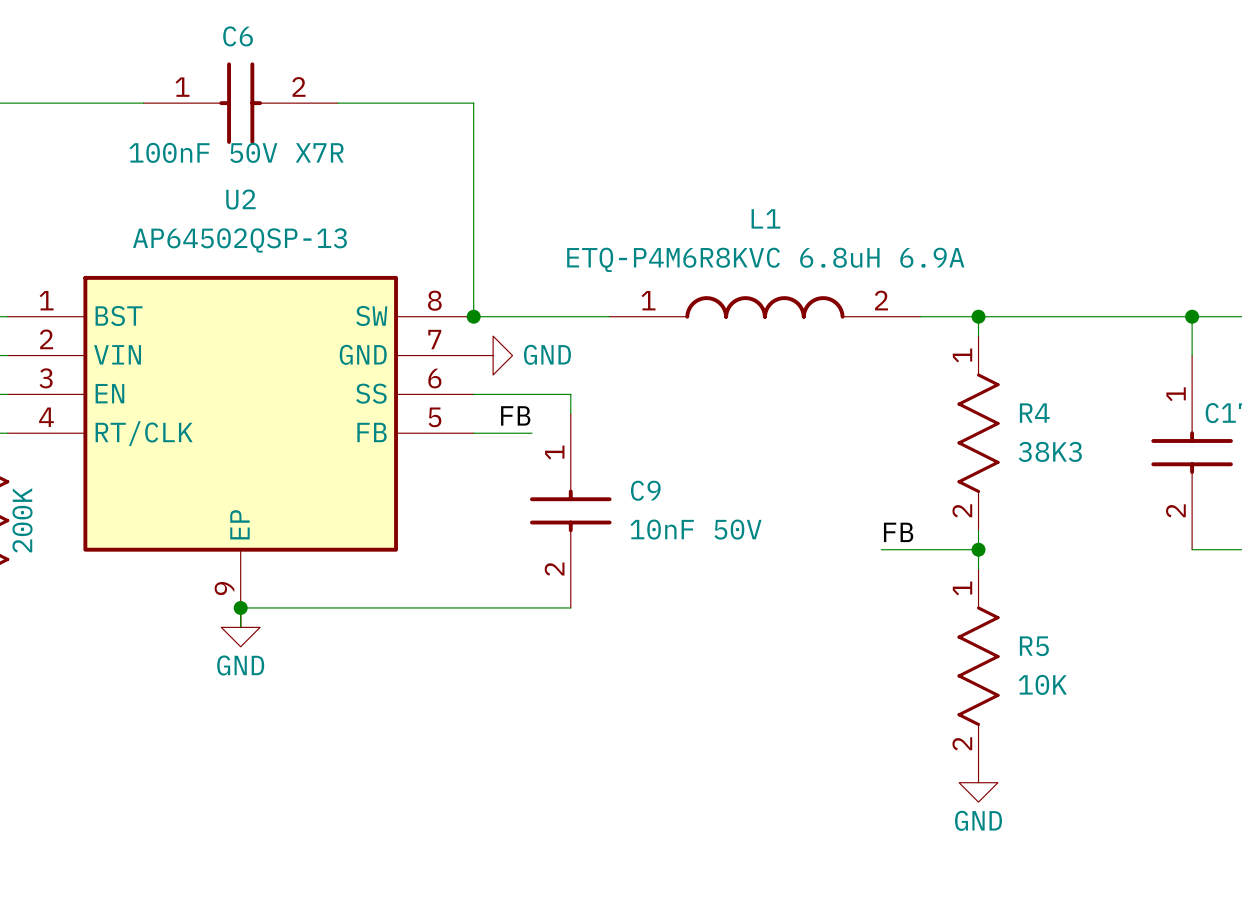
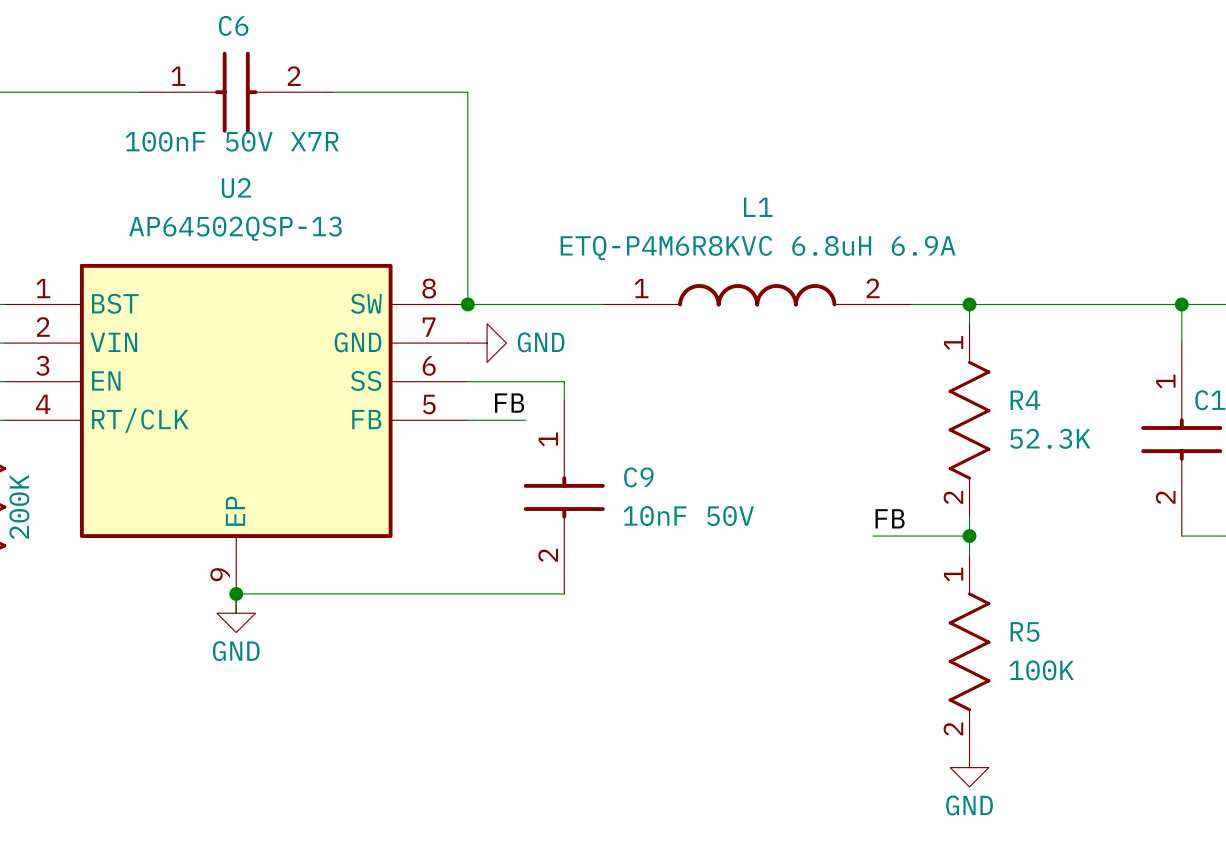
R4 value: 38K3 (1050, 451) -> 52.3K (1050, 438)
R5 value: 10K (1042, 684) -> 100K (1041, 670)

